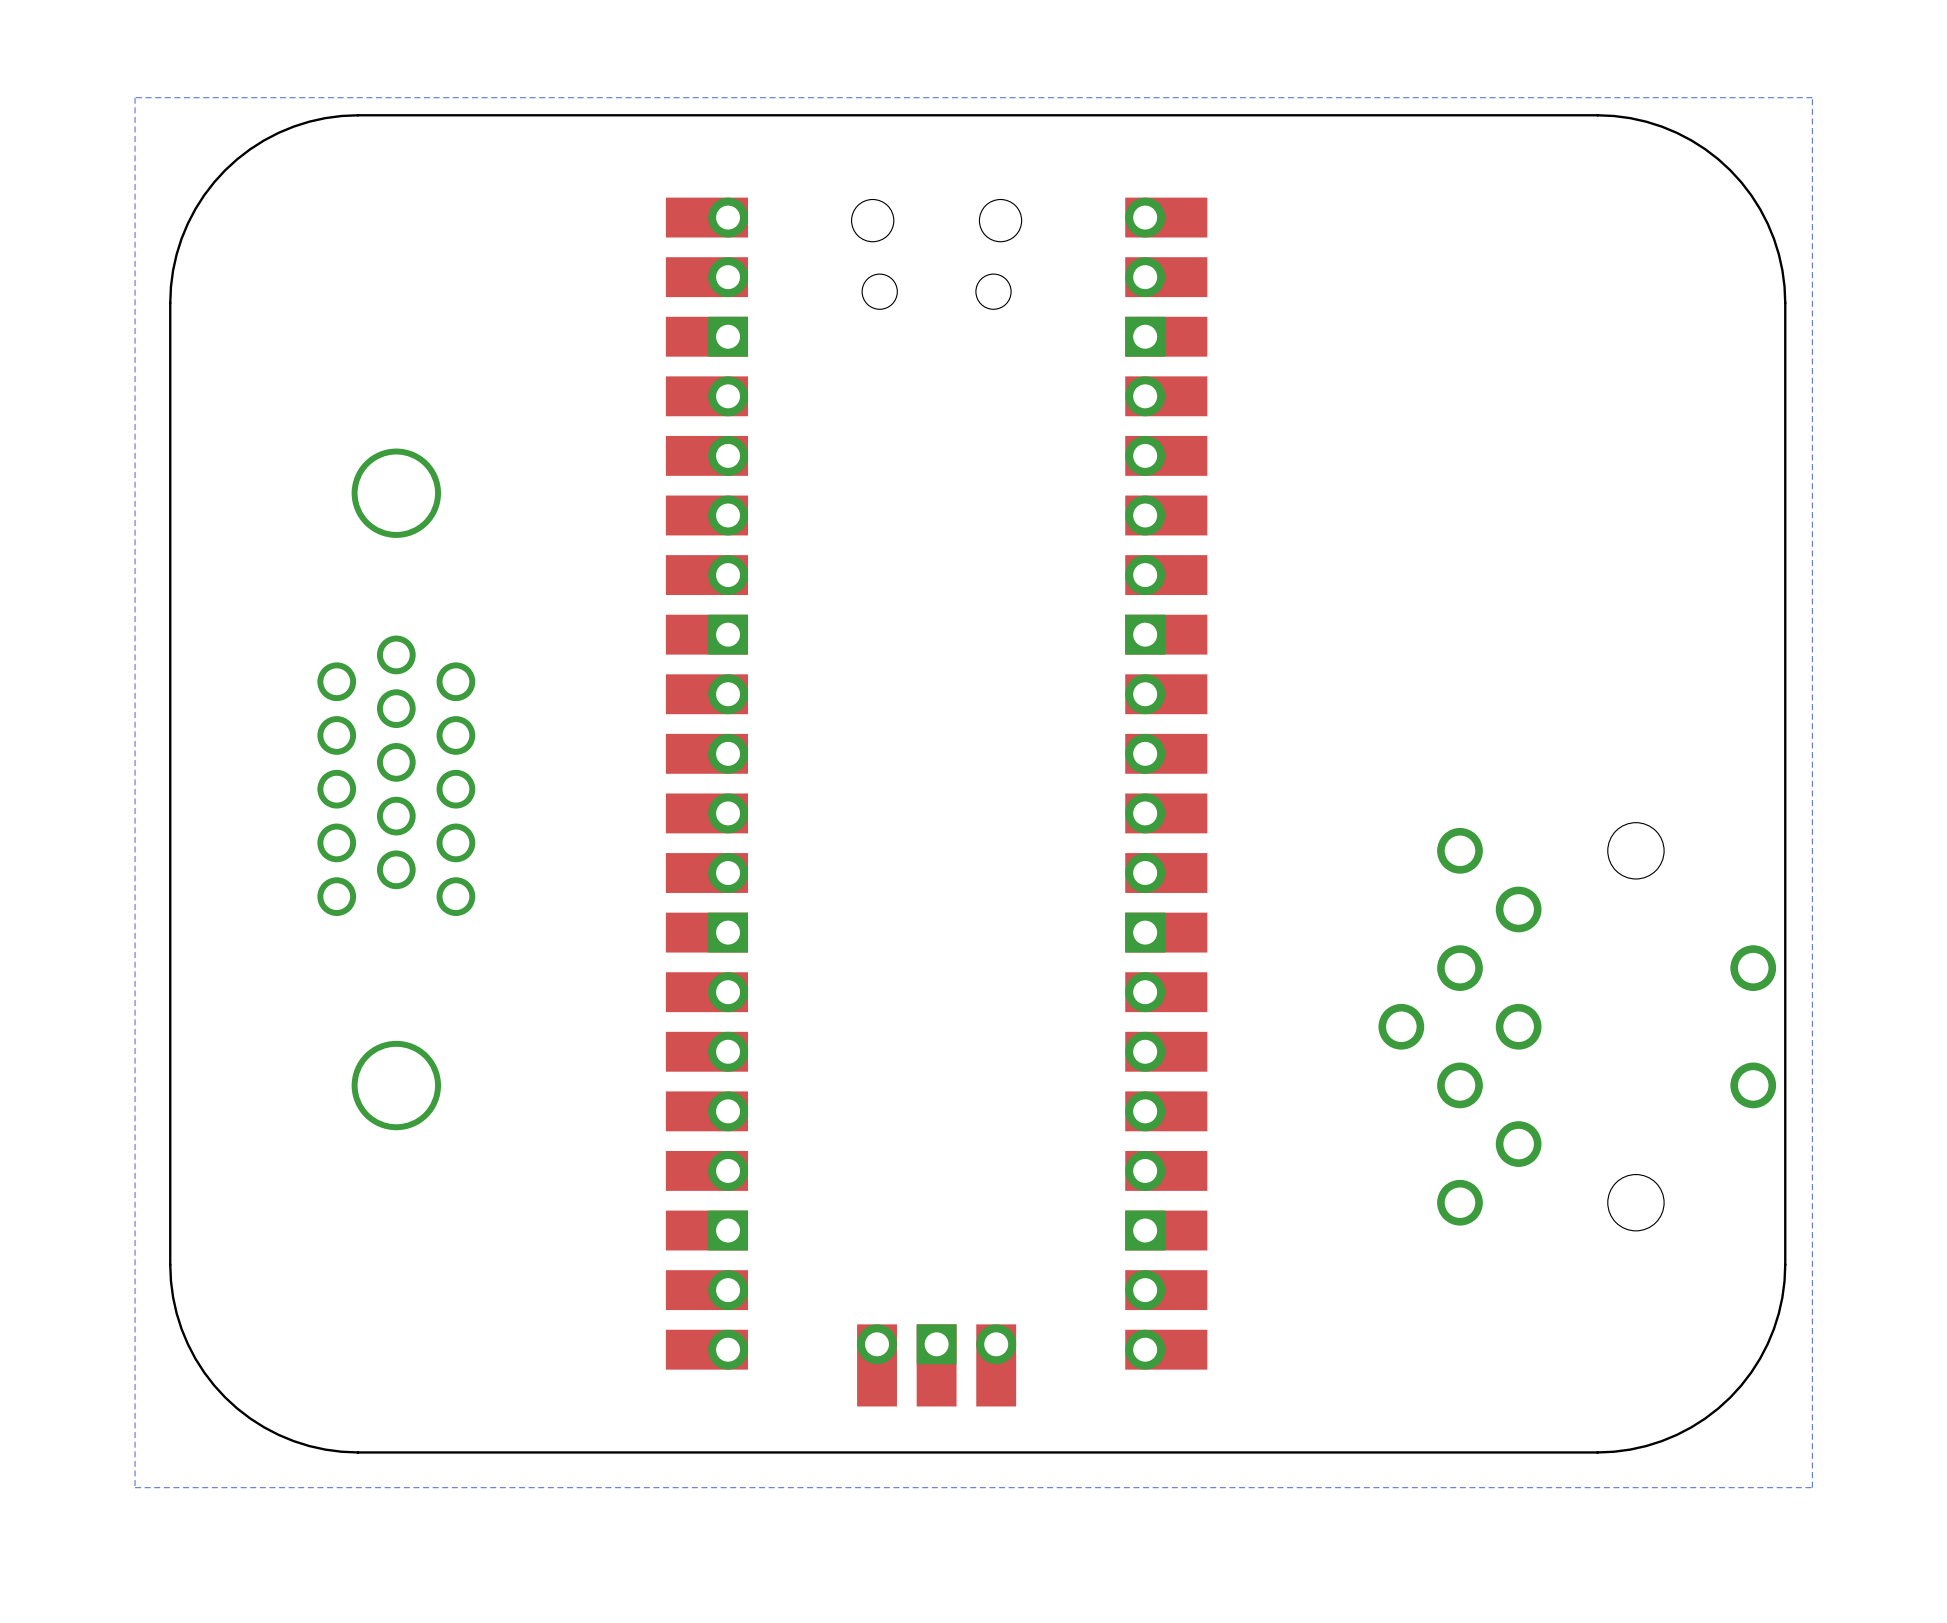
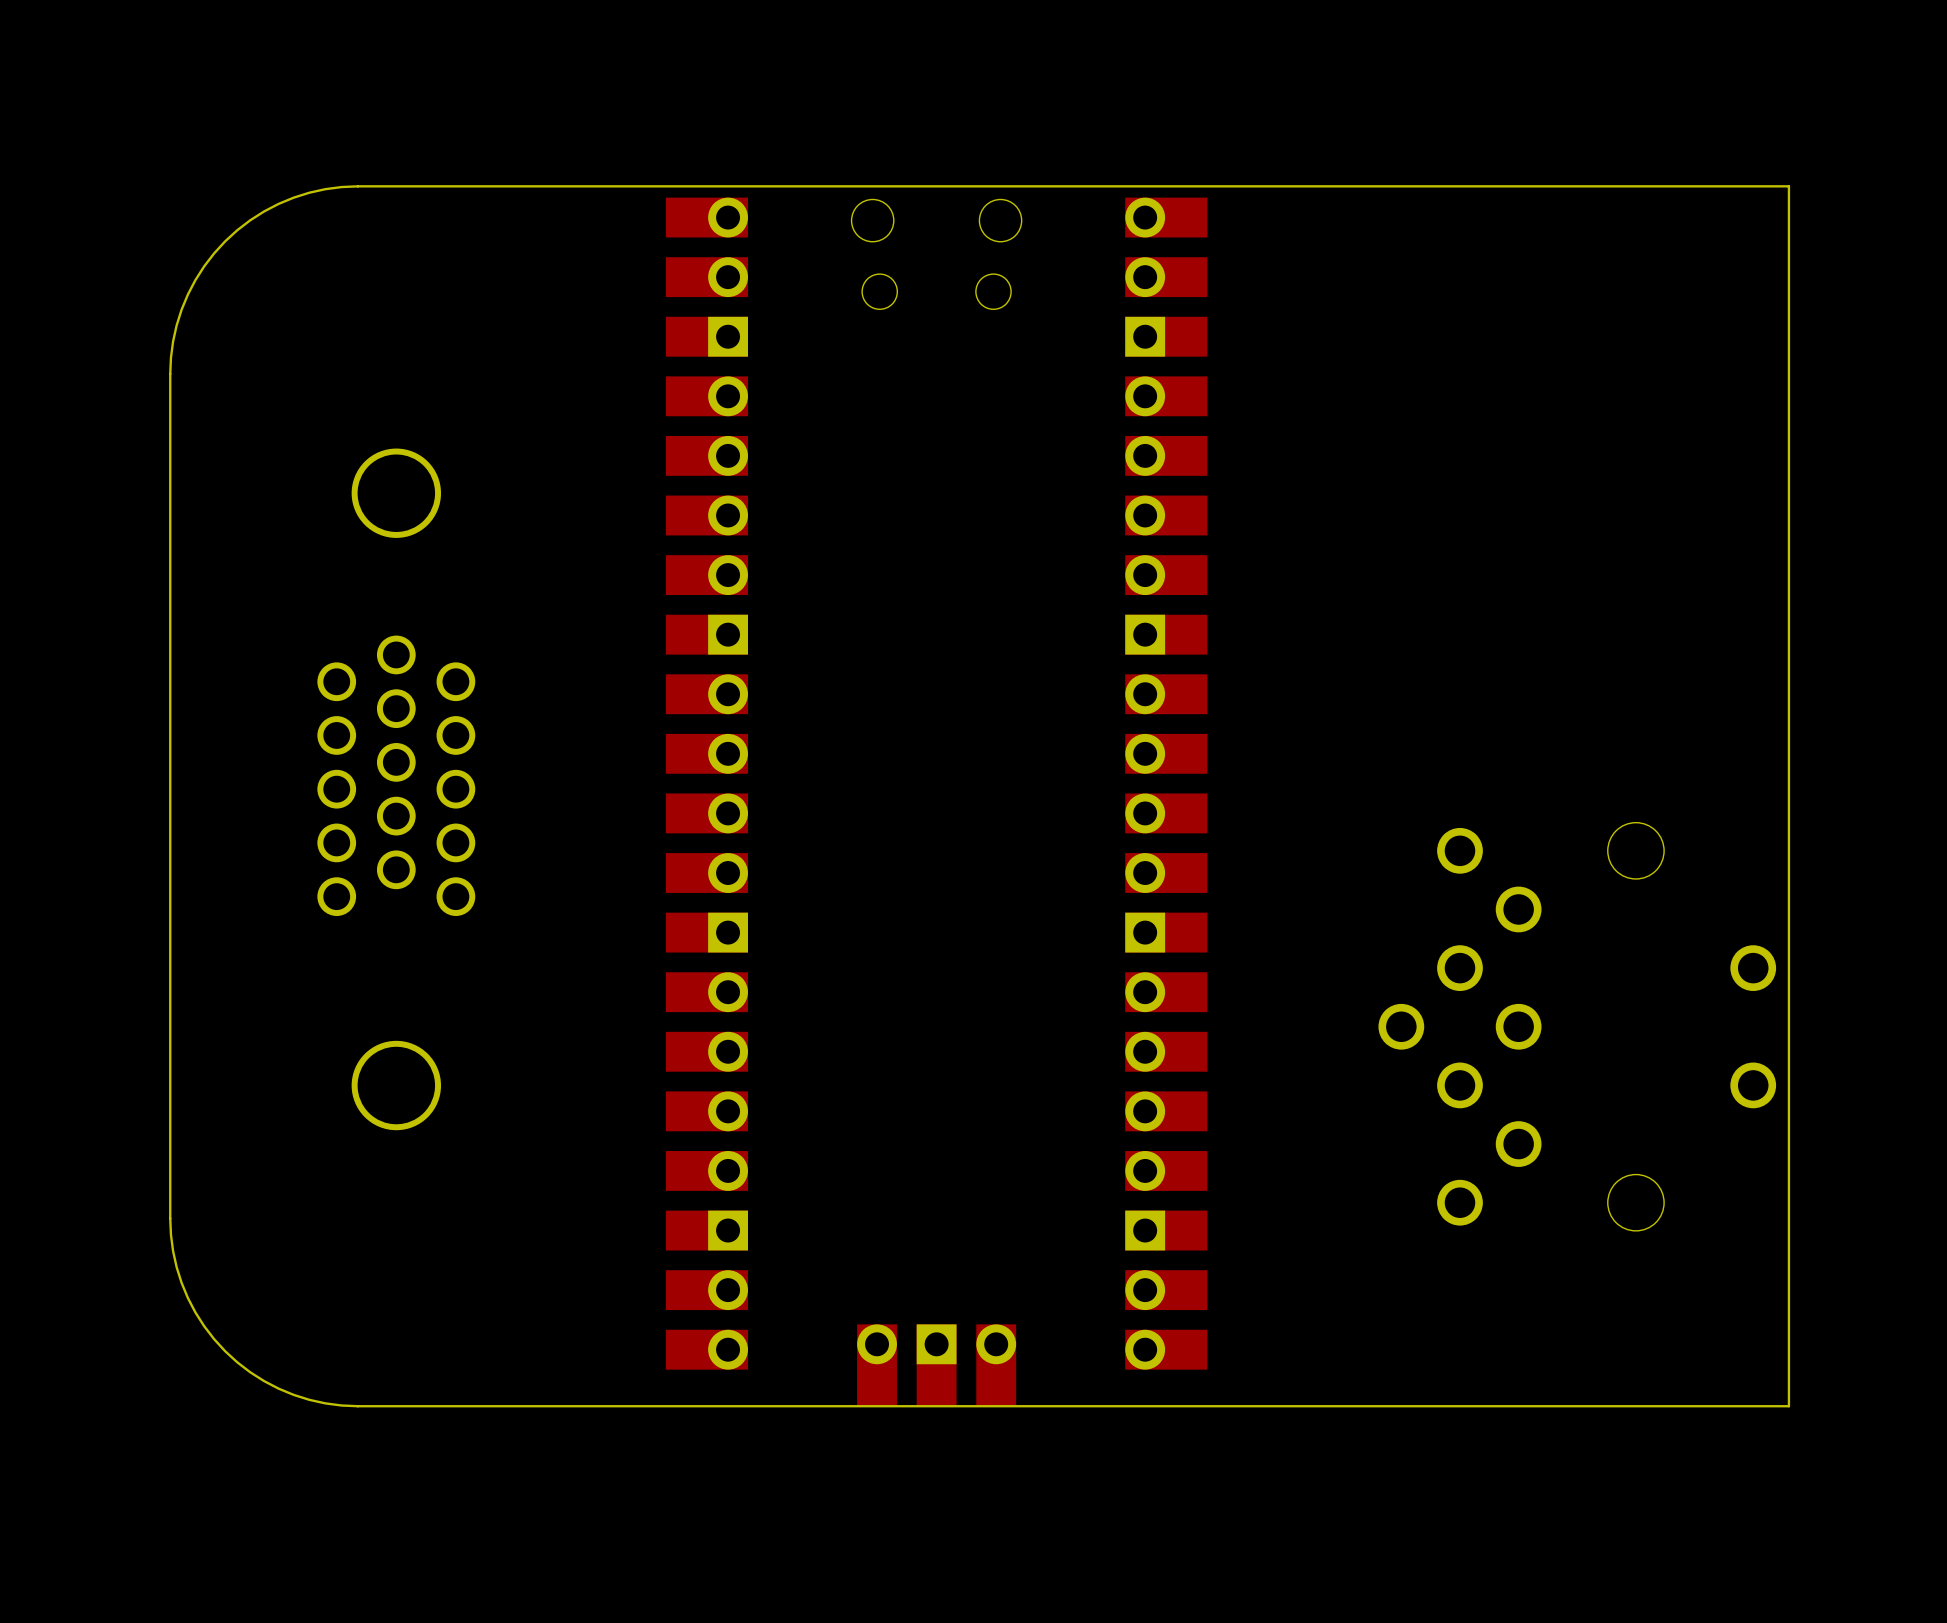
bottom zone outline: (1812, 97) (1812, 1487) (135, 1487) (135, 97) (1812, 97) -> none
board edge: (170, 374) (170, 302) (173, 270) (187, 223) (204, 195) (225, 170) (264, 140) (309, 121) (341, 115) (1613, 115) (1646, 121) (1676, 132) (1705, 149) (1730, 170) (1751, 195) (1767, 223) (1778, 254) (1784, 286) (1784, 1281) (1773, 1328) (1751, 1372) (1730, 1397) (1691, 1427) (1646, 1446) (1597, 1452) (357, 1452) (325, 1449) (293, 1441) (264, 1427) (225, 1397) (204, 1372) (187, 1344) (173, 1297) (170, 1264) (170, 1218) -> (170, 374) (176, 325) (187, 294) (204, 266) (225, 241) (250, 220) (278, 203) (309, 192) (341, 187) (1788, 186) (1788, 1406) (341, 1405) (309, 1399) (278, 1388) (250, 1372) (214, 1339) (195, 1312) (181, 1282) (173, 1251) (170, 1218)

